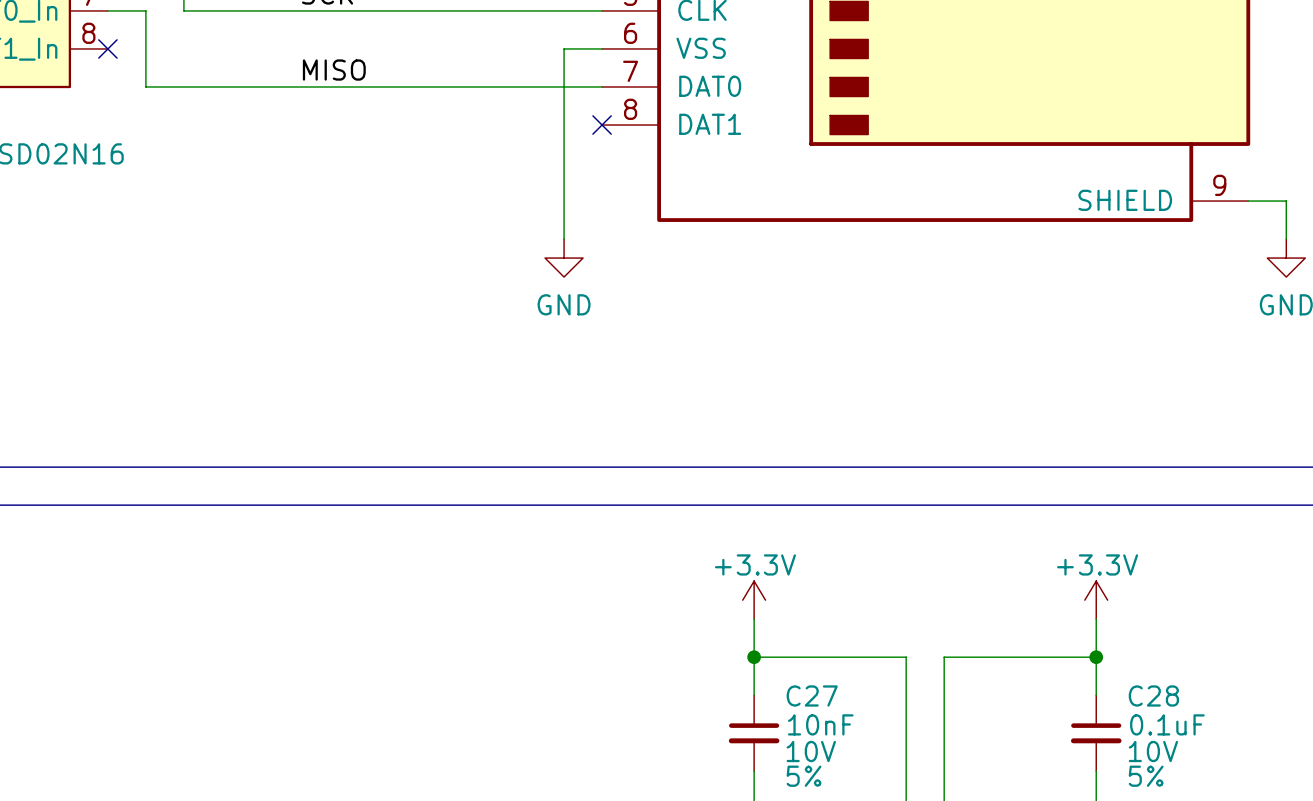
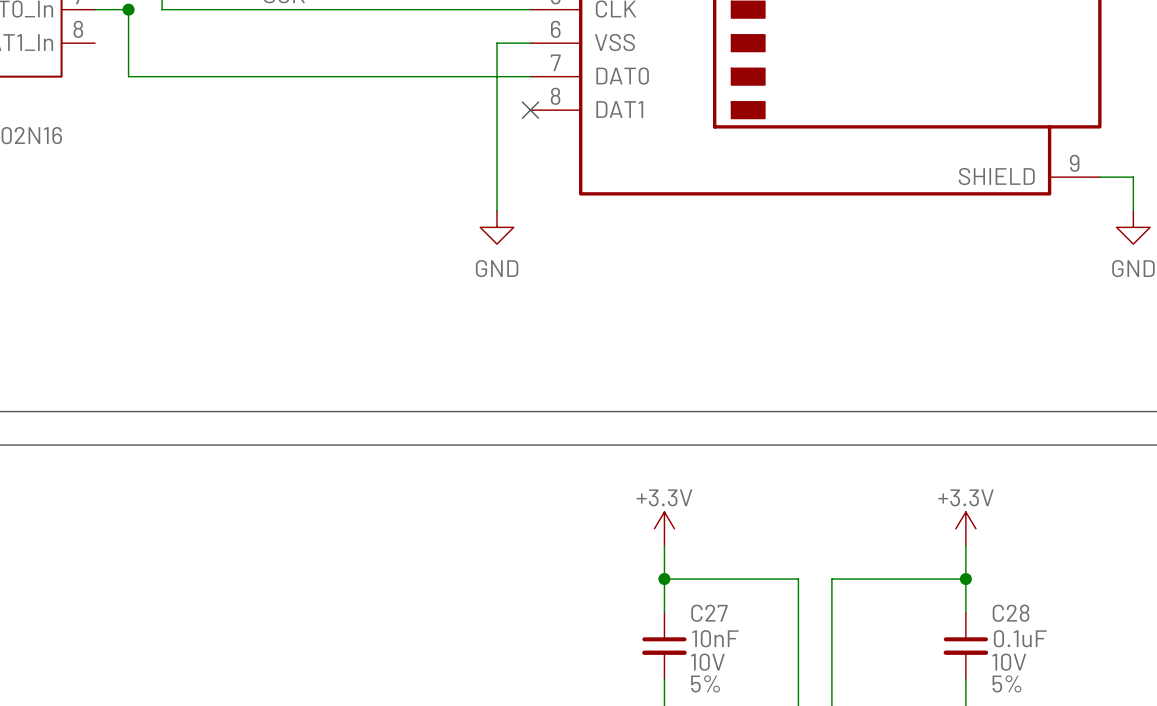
junction: none -> (128, 9)
no-connect mark: (107, 48) -> none
label: MISO (334, 70) -> none

